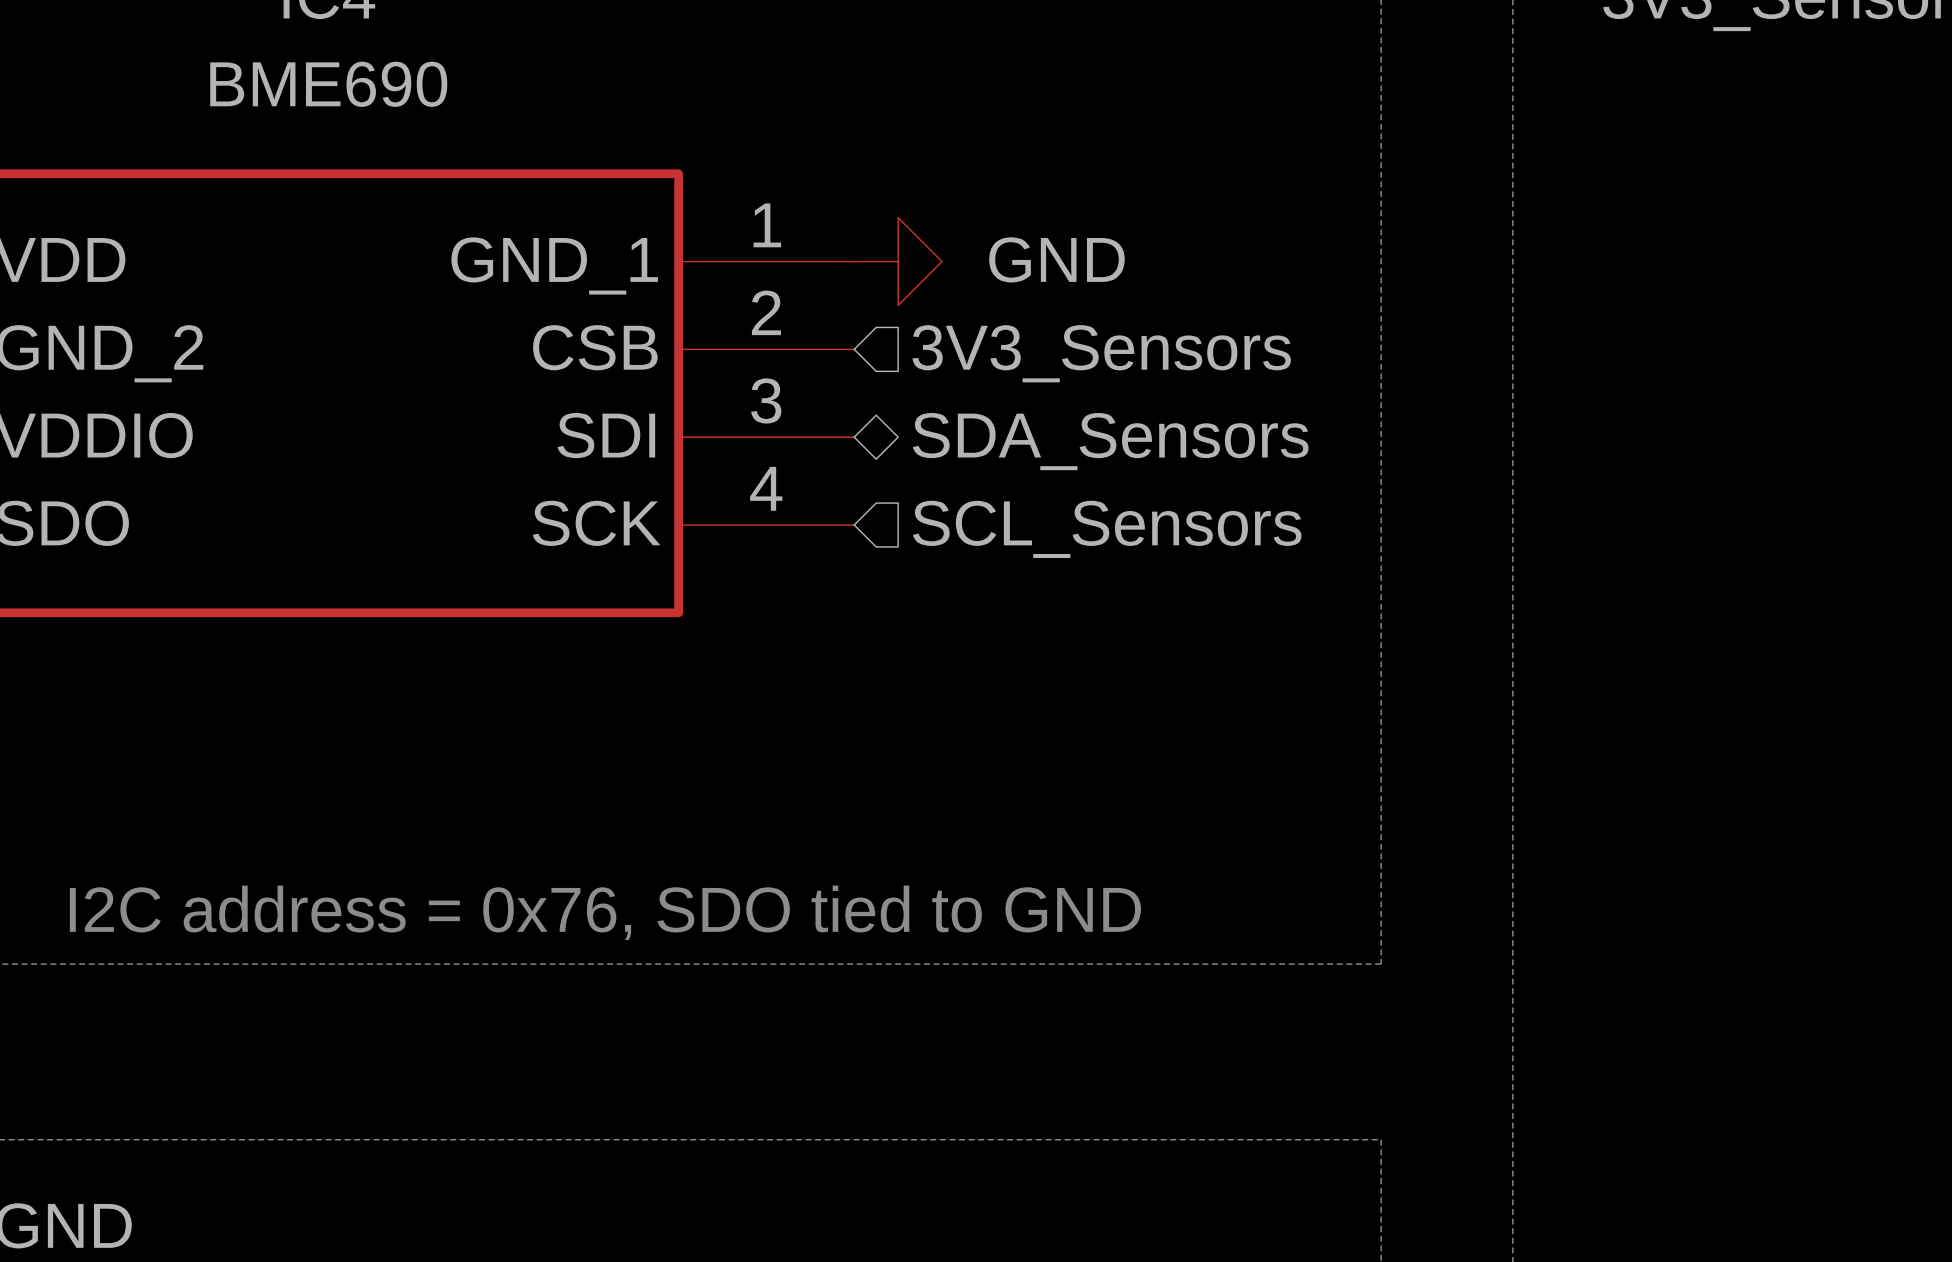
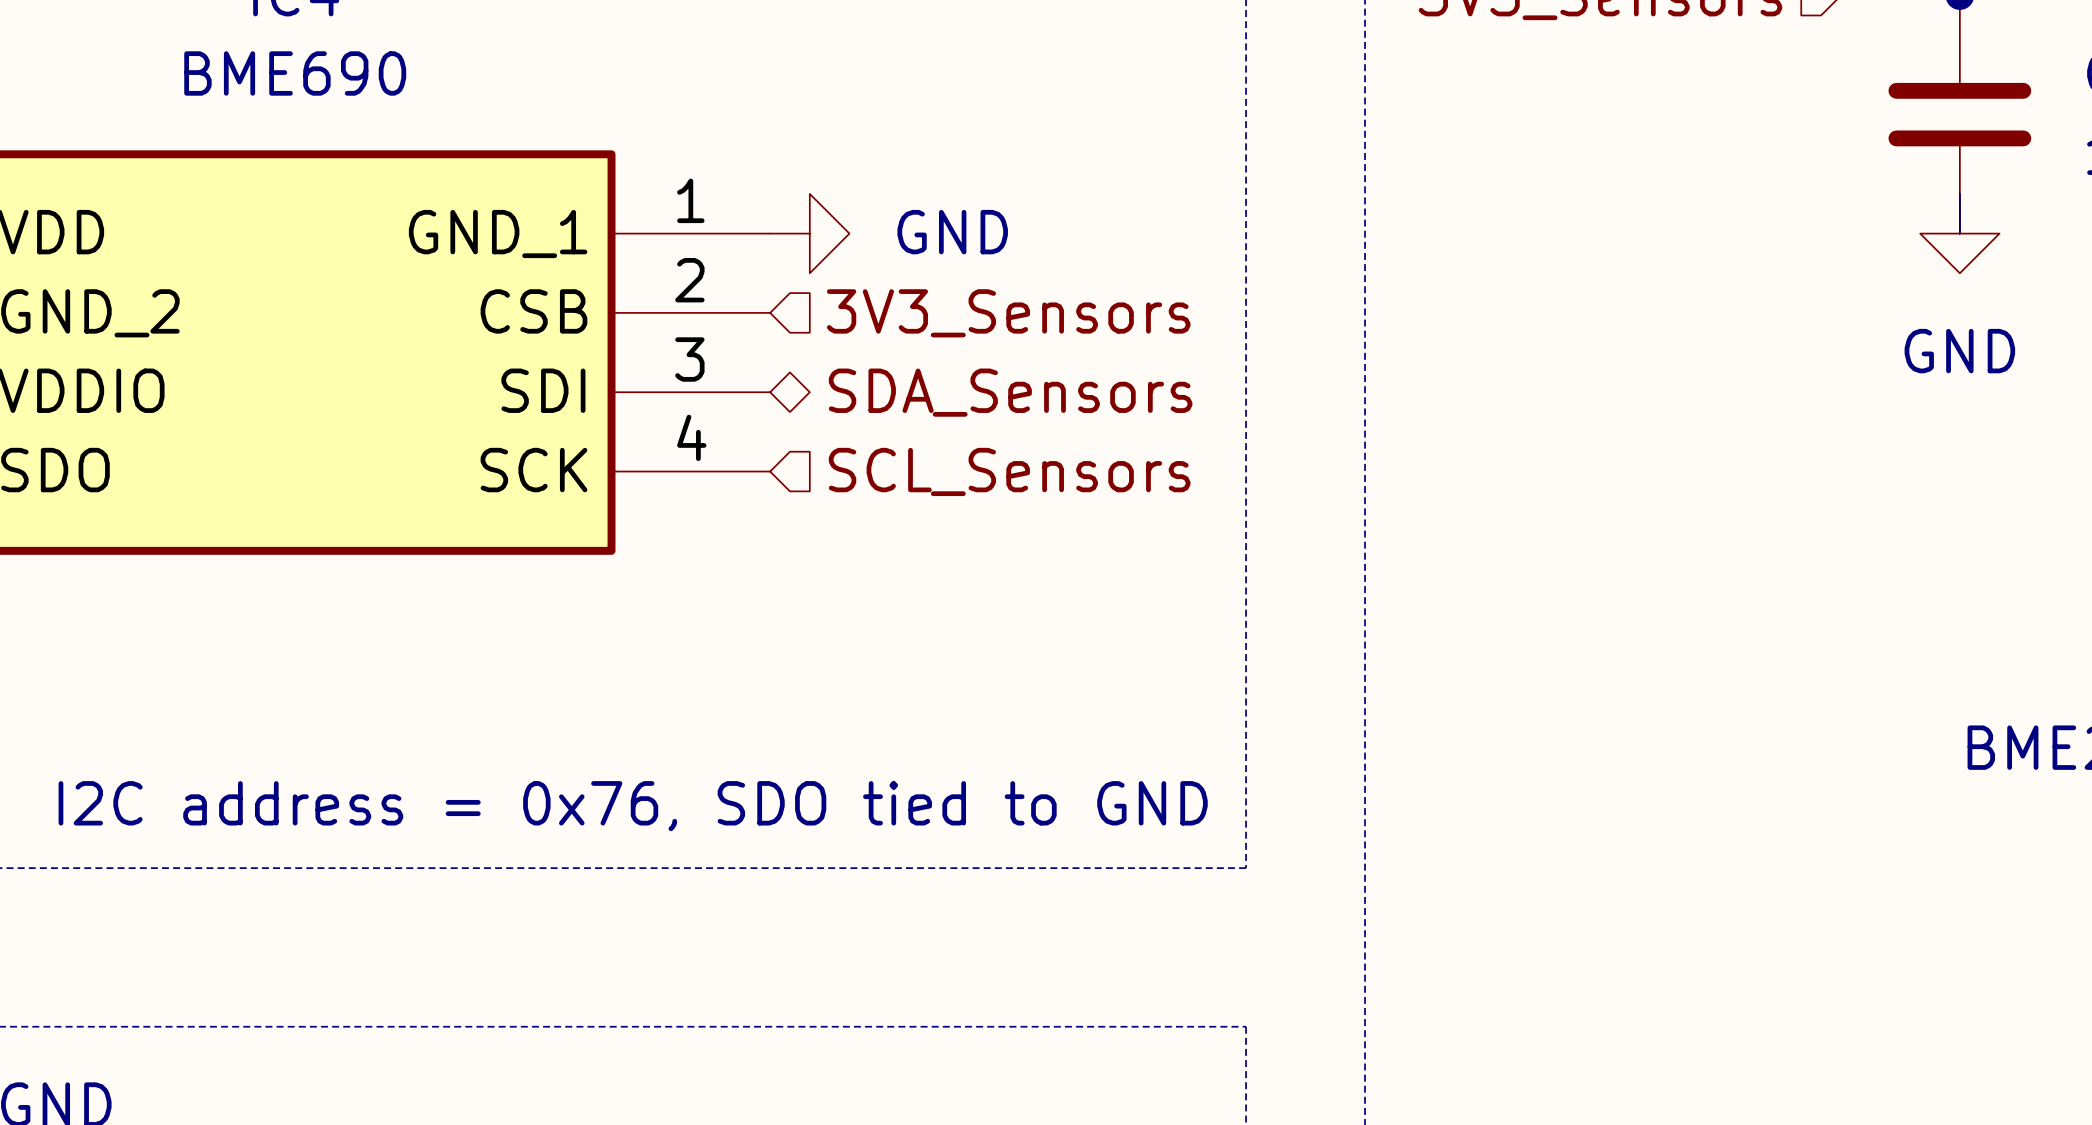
text position: I2C address = 0x76, SDO tied to GND (605, 912) -> I2C address = 0x76, SDO tied to GND (633, 806)

